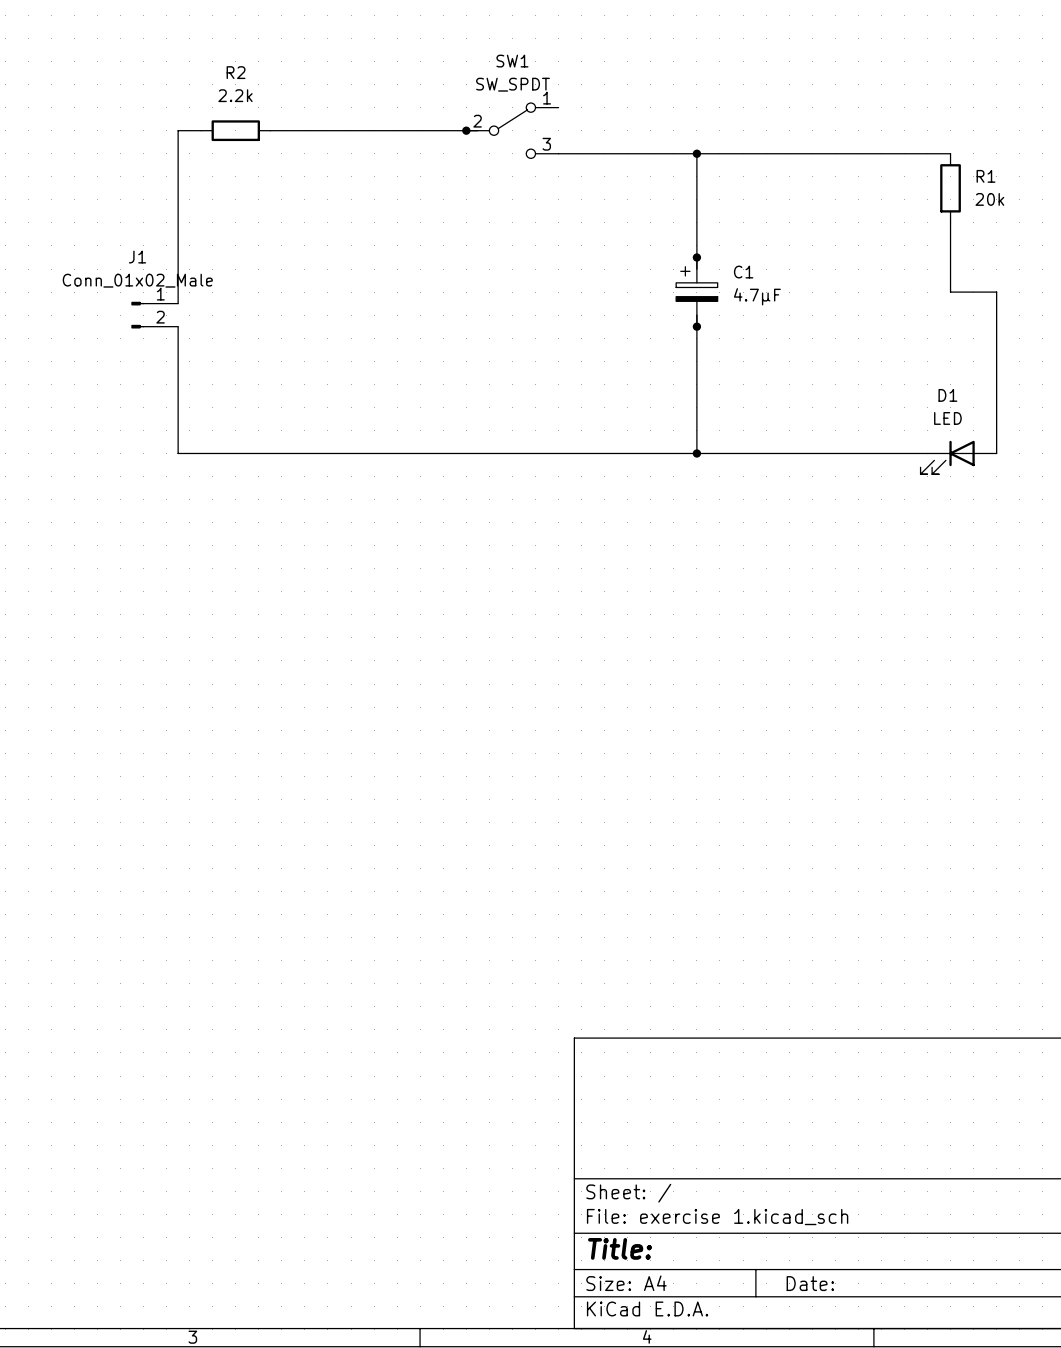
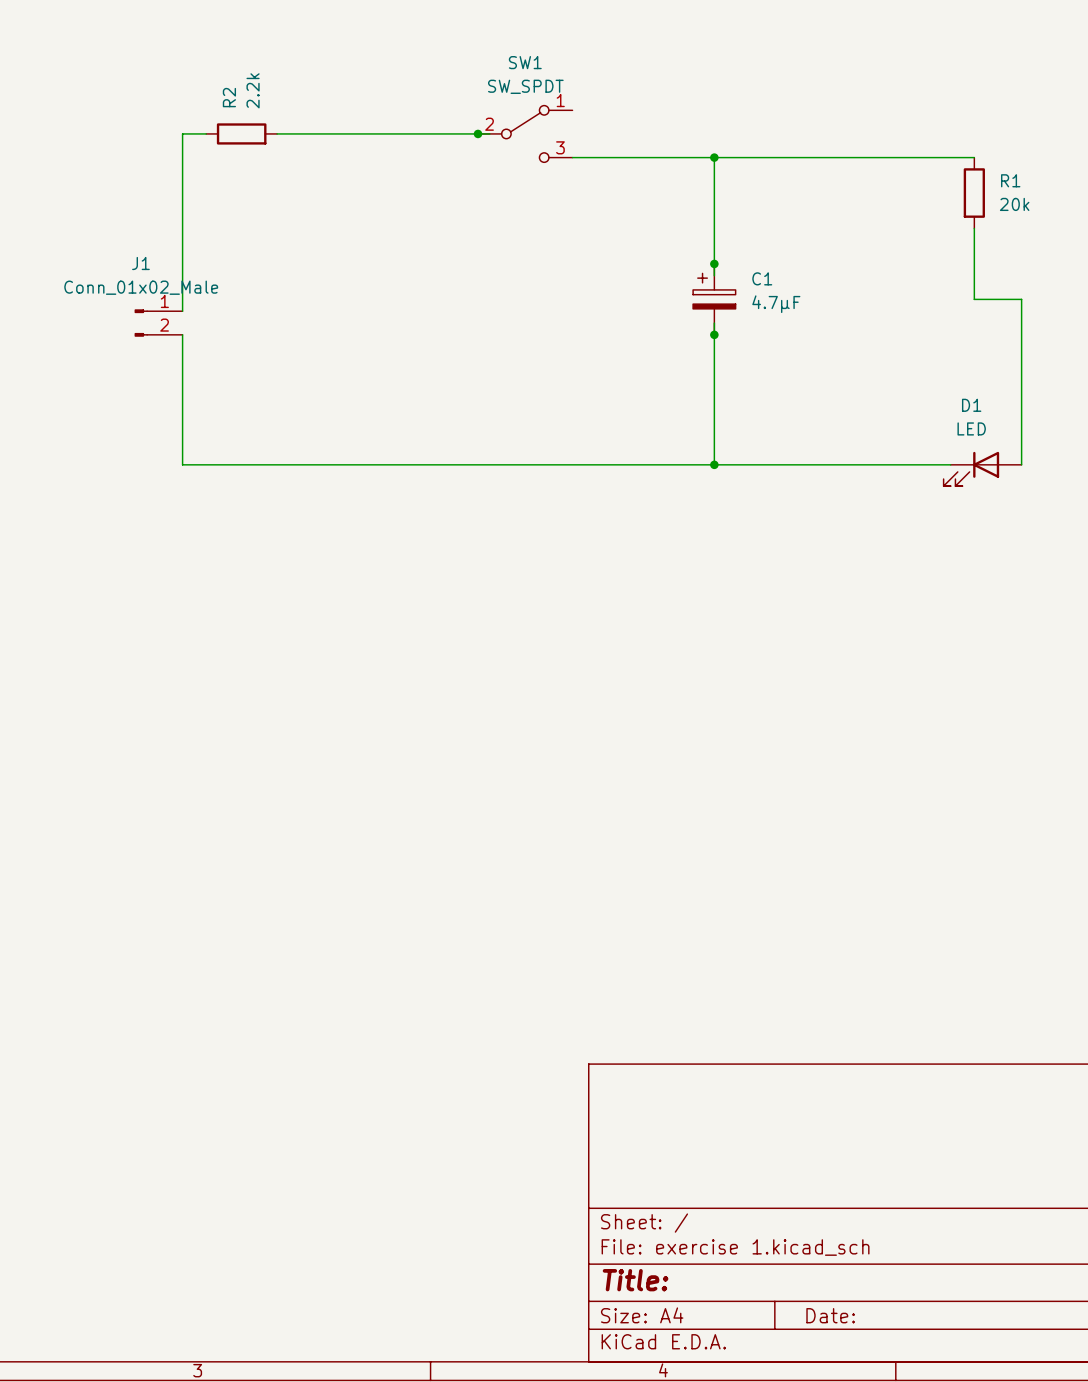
R2 name rotation: 0° (236, 72) -> 90° counterclockwise (229, 97)
R2 value rotation: 0° (235, 95) -> 90° counterclockwise (253, 90)

